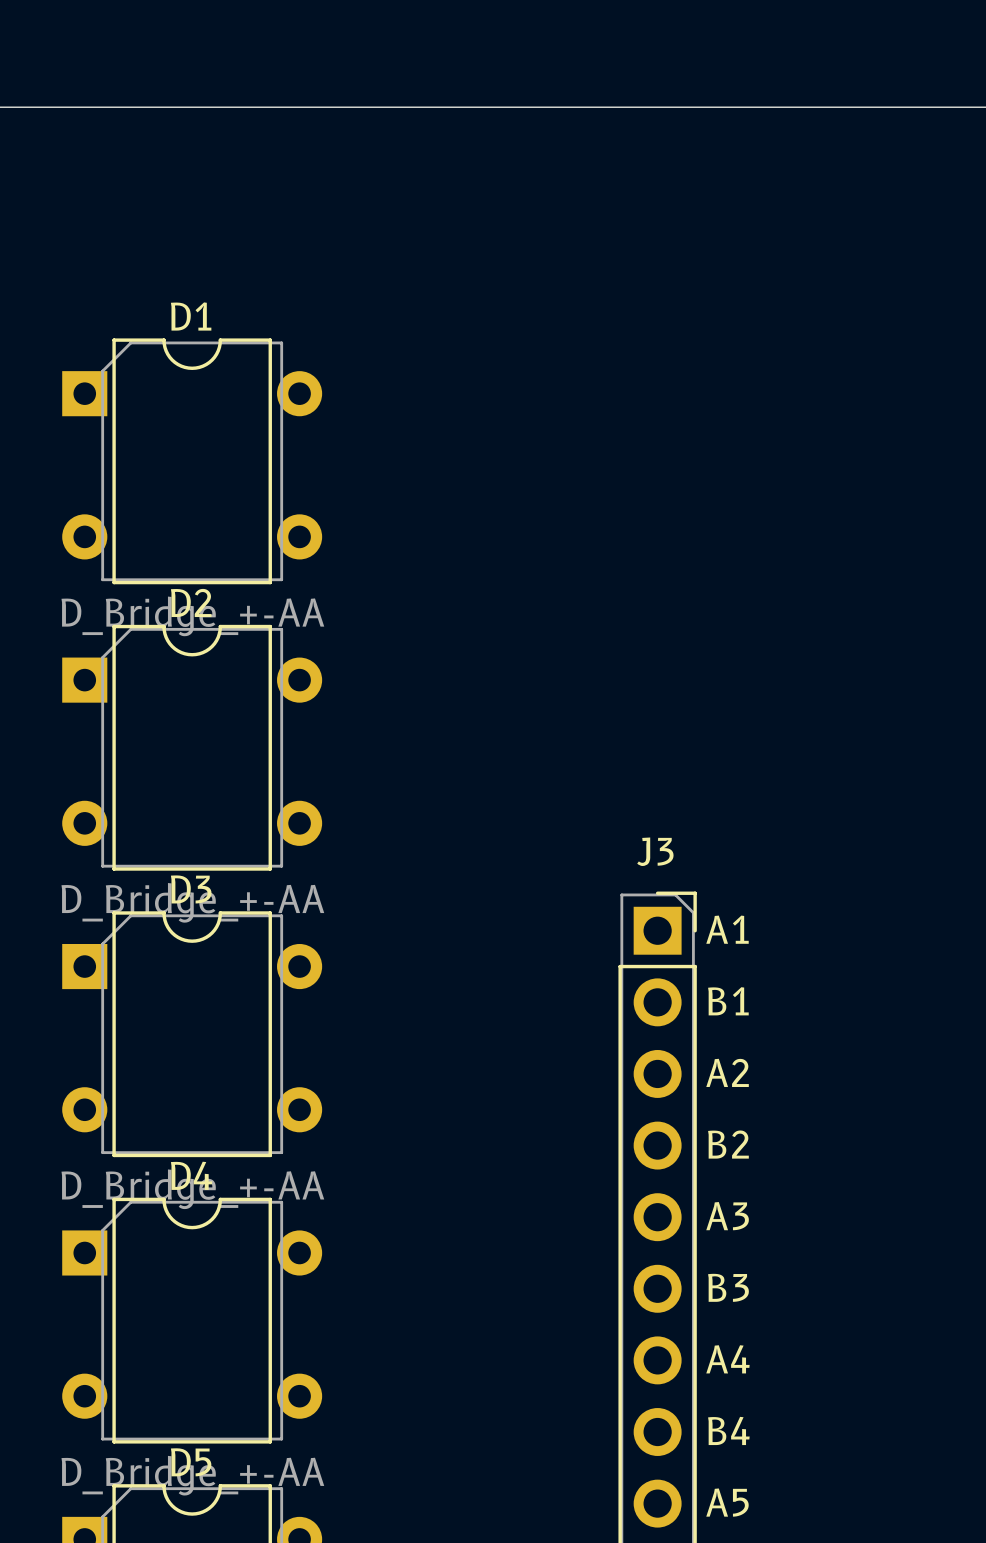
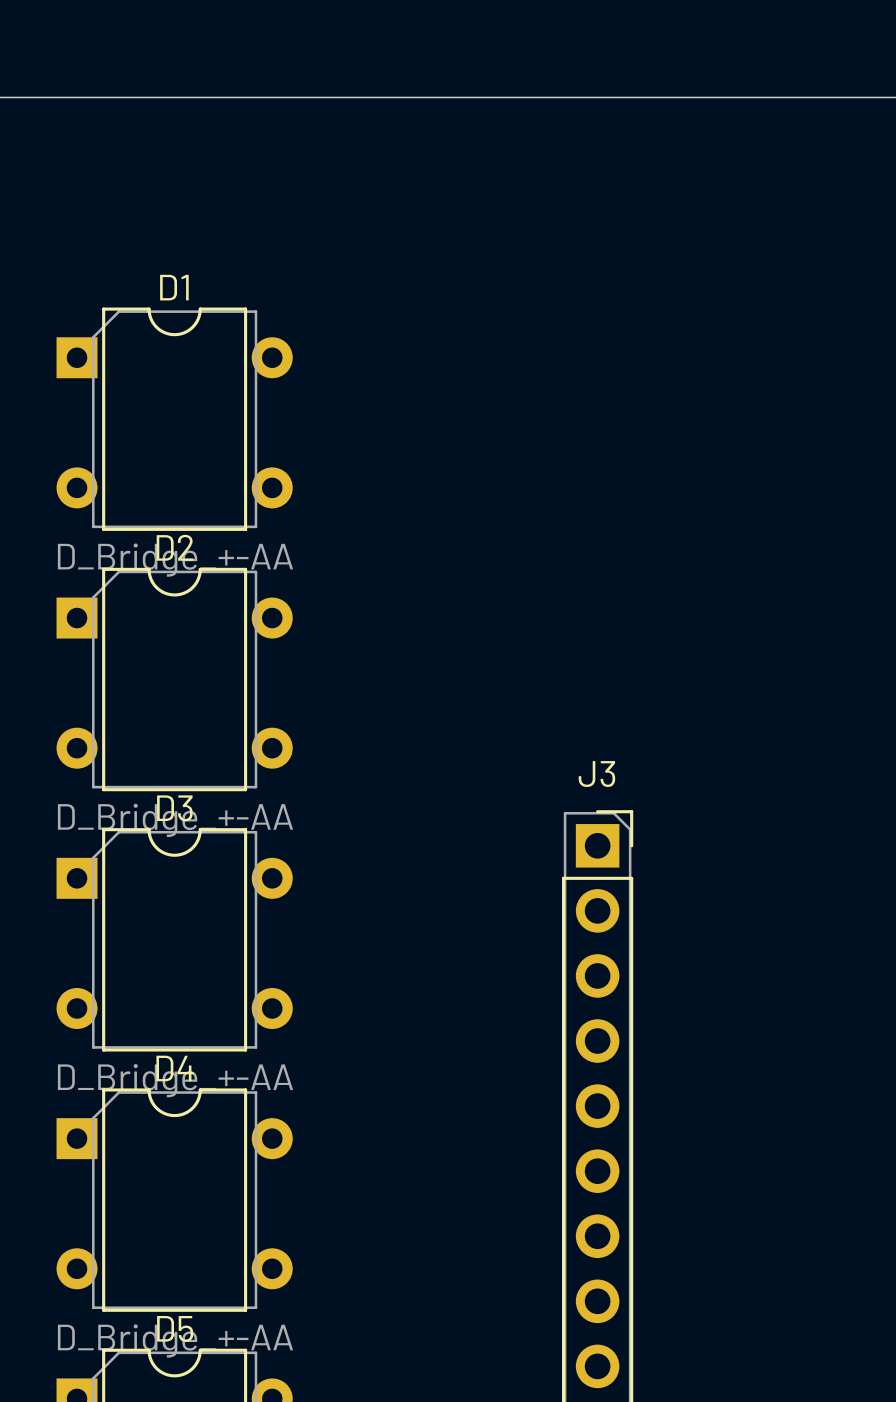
text: A1 (727, 929) -> none
text: B1 (728, 1001) -> none
text: A2 (727, 1072) -> none
text: B2 (728, 1144) -> none
text: A3 (727, 1216) -> none
text: B3 (728, 1287) -> none
text: A4 (727, 1359) -> none
text: B4 (728, 1430) -> none
text: A5 (727, 1502) -> none

